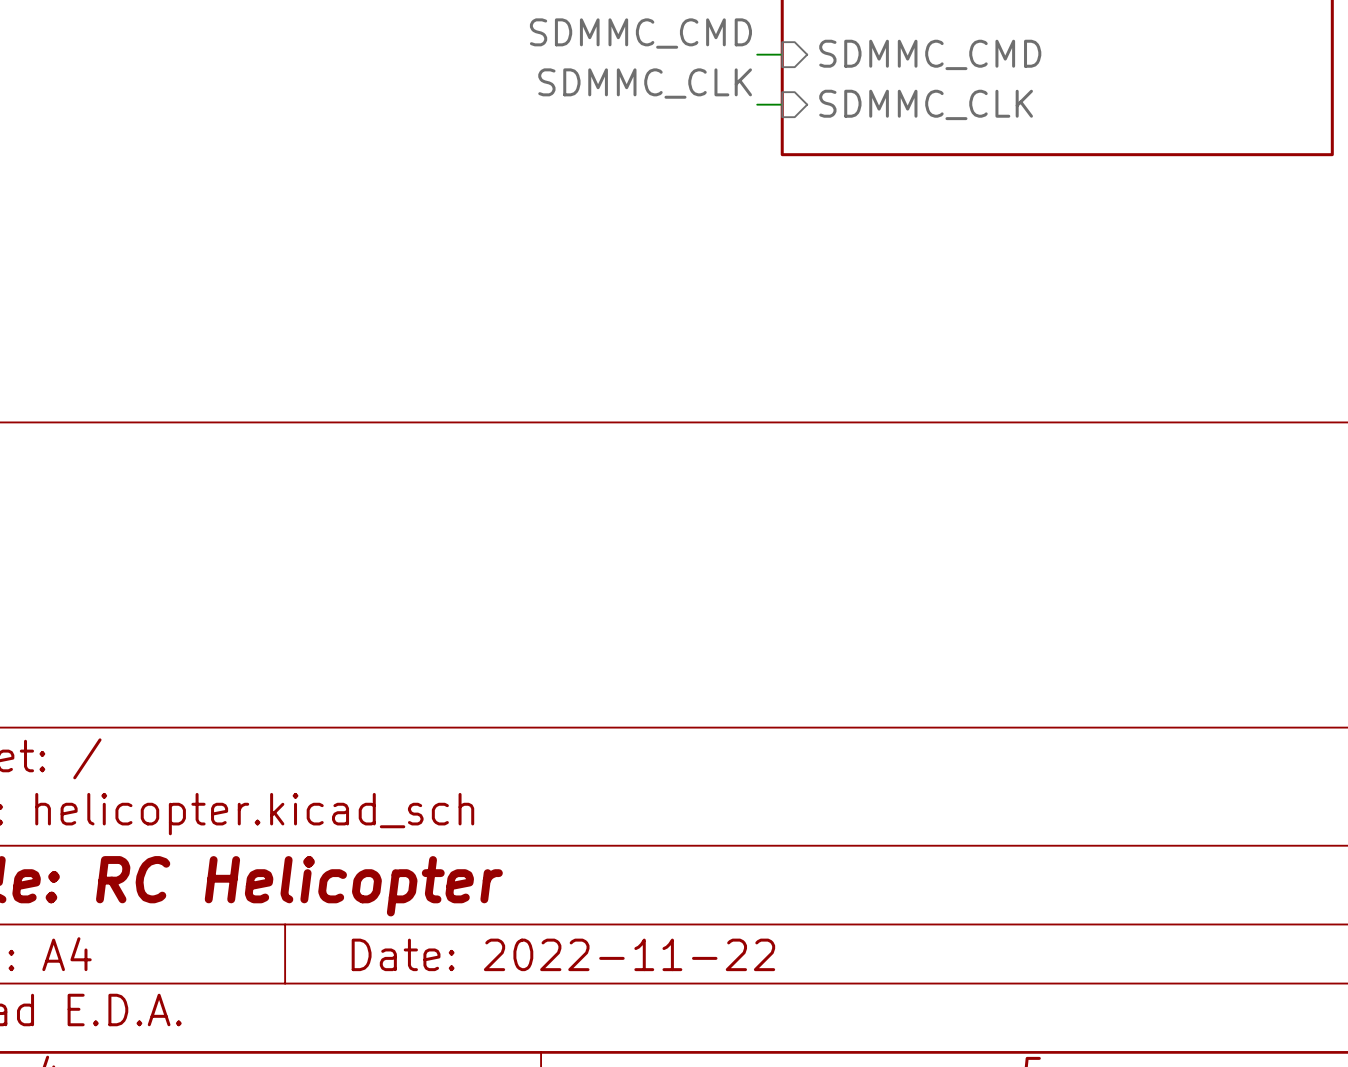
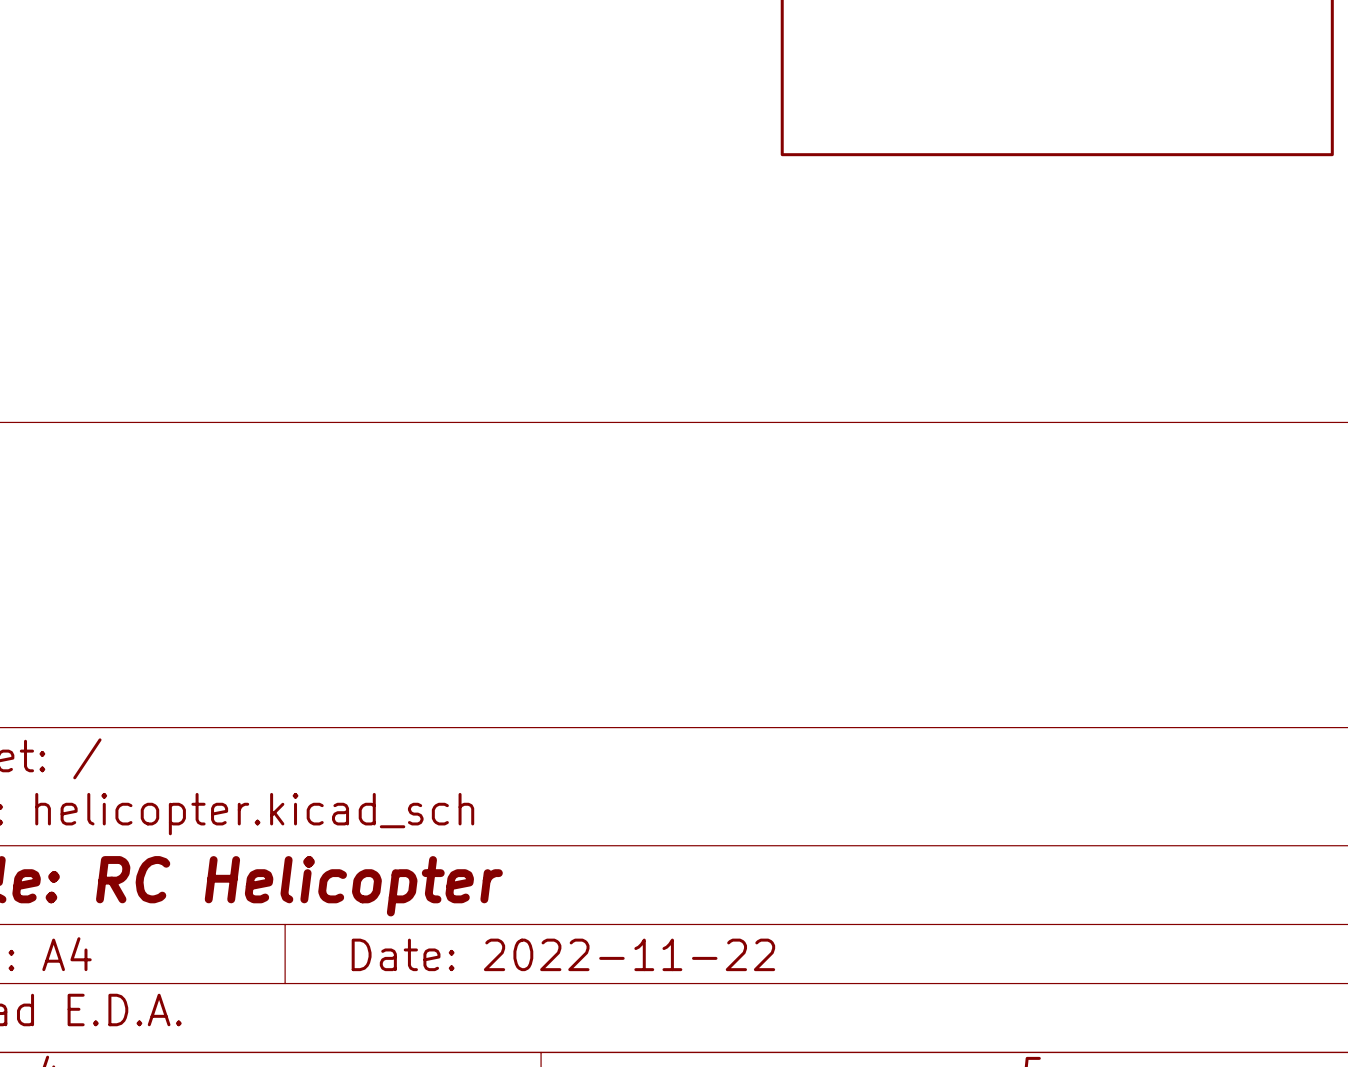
label: SDMMC_CMD (640, 33) -> none
wire: (757, 54) (782, 54) -> none
sheet pin: SDMMC_CMD (930, 54) -> none
label: SDMMC_CLK (645, 83) -> none
wire: (757, 104) (782, 104) -> none
sheet pin: SDMMC_CLK (926, 104) -> none

